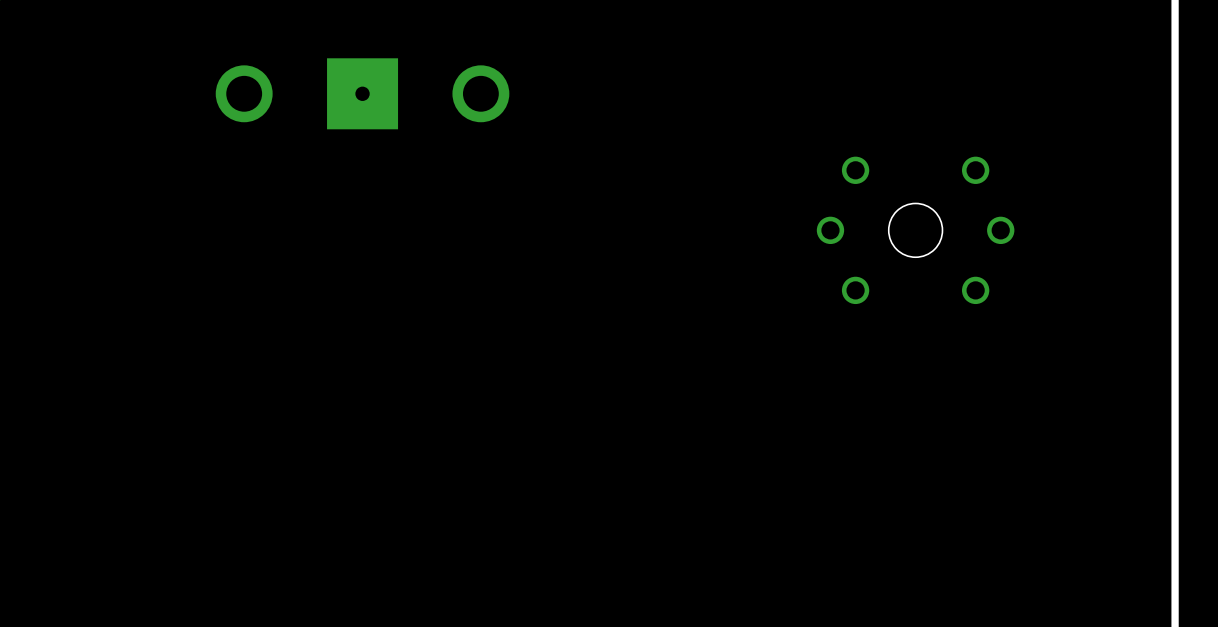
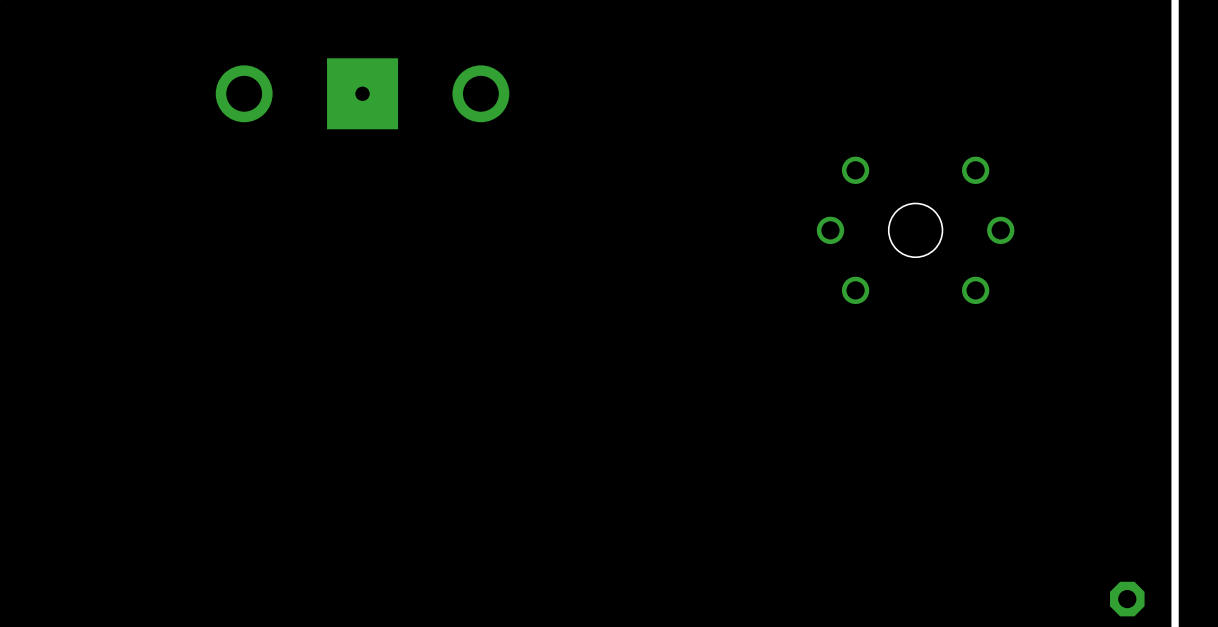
part: none -> (1127, 599)

